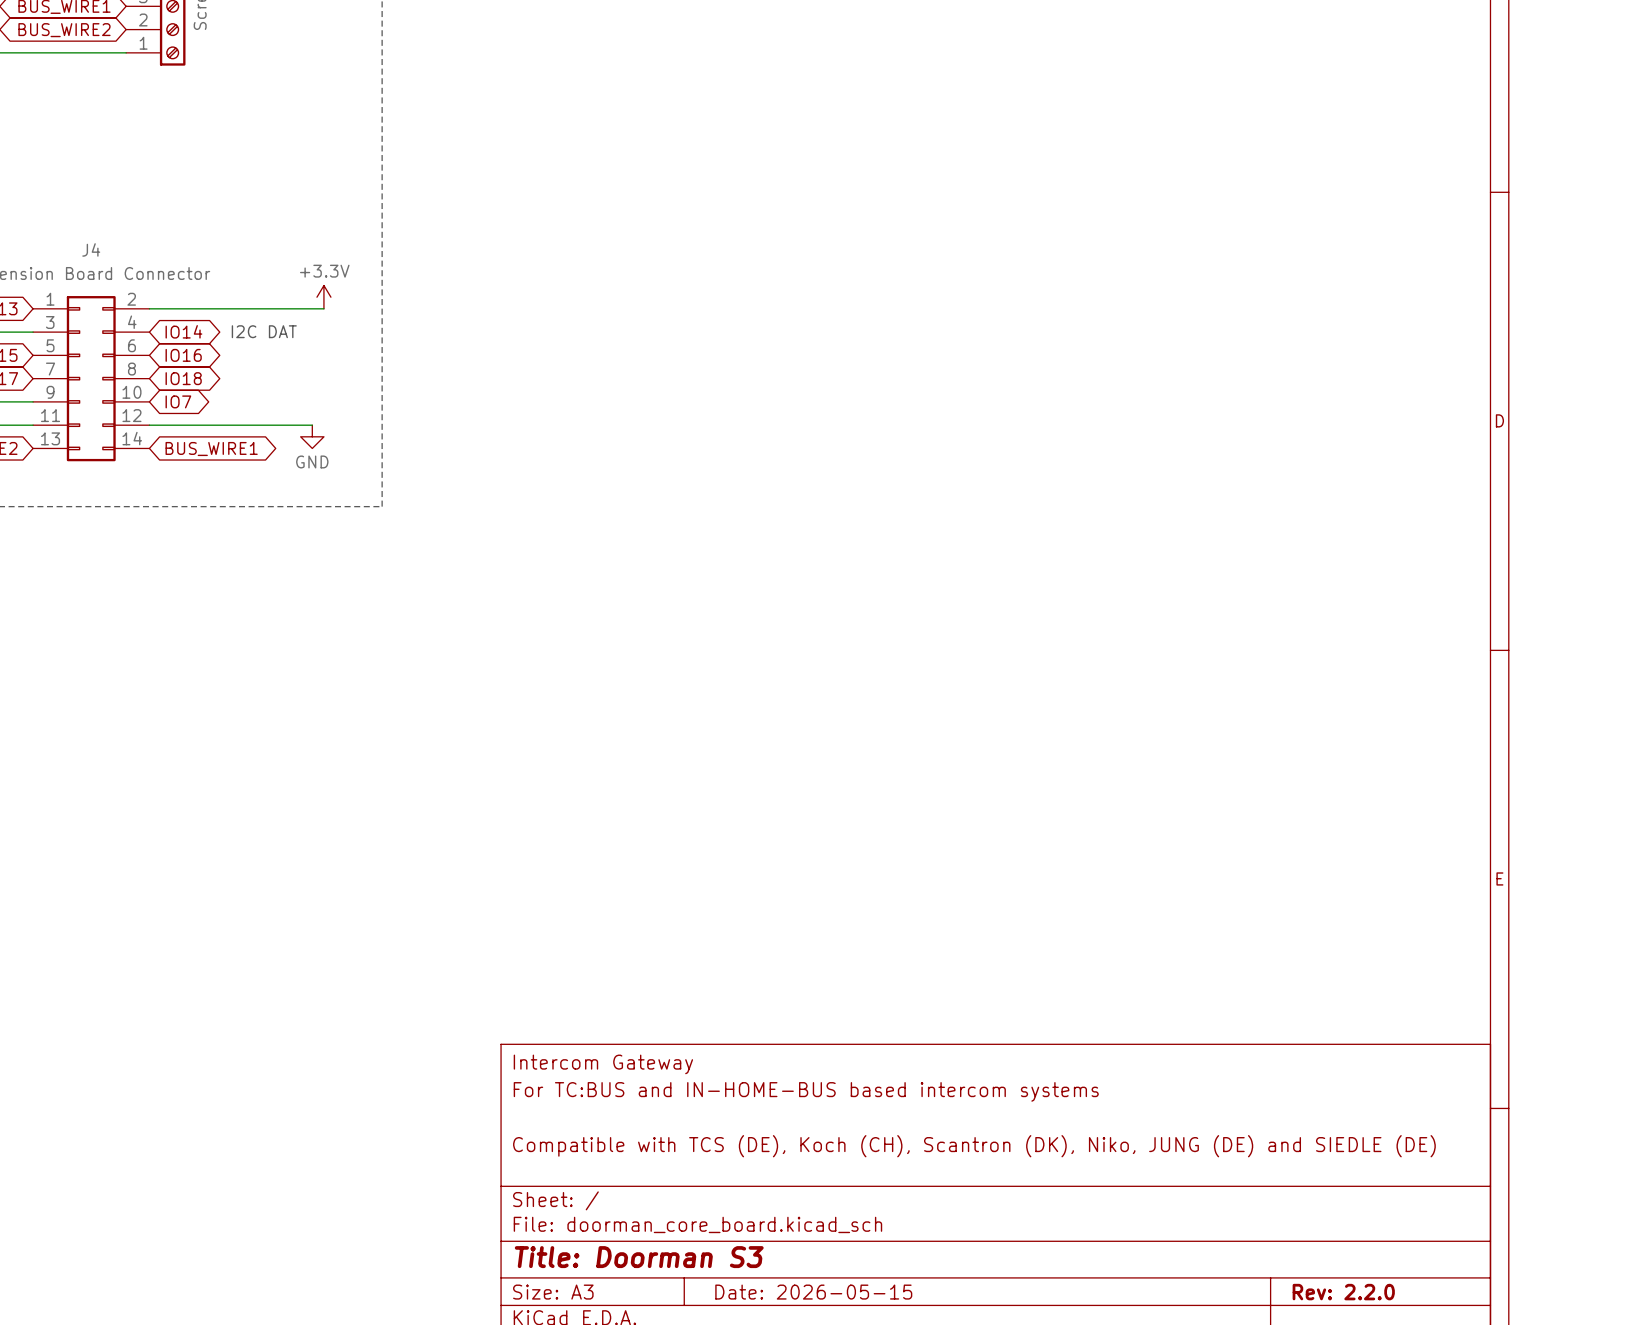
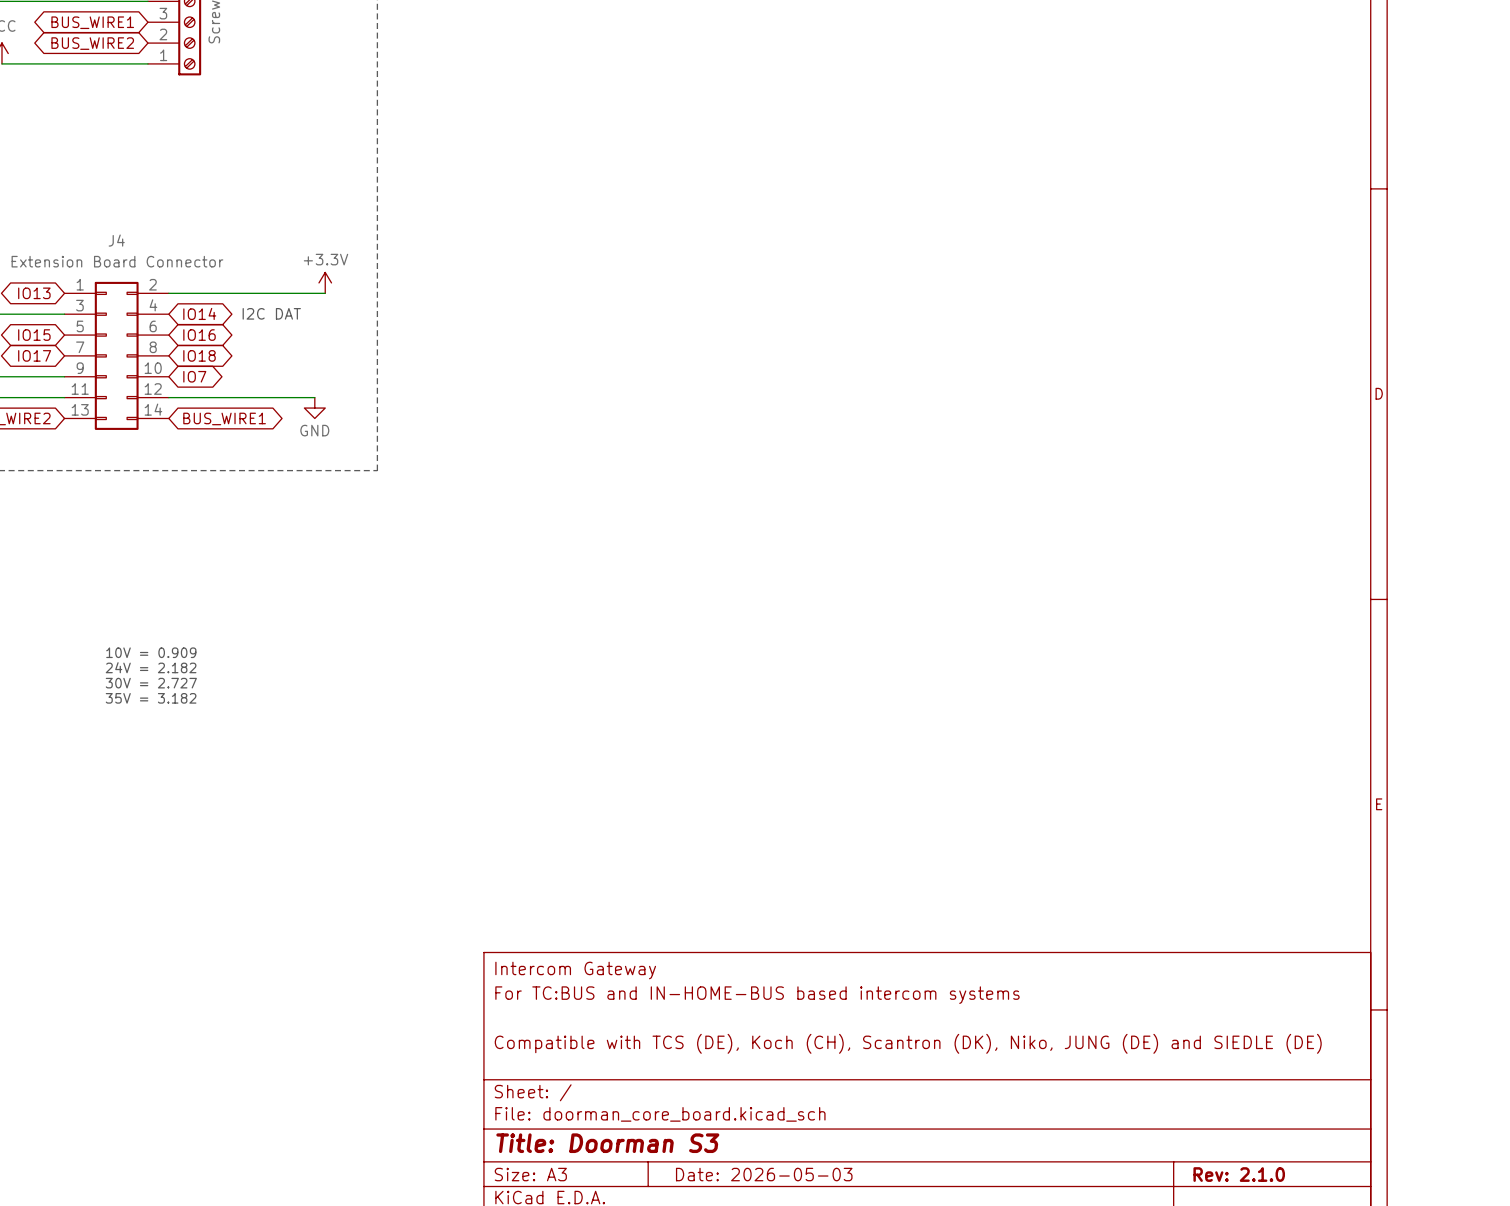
text: none -> 10V = 0.909 (151, 652)
text: none -> 24V = 2.182 (151, 667)
text: none -> 30V = 2.727 (151, 683)
text: none -> 35V = 3.182 (151, 698)
title block: Date: 2026-05-15 (813, 1292) -> Date: 2026-05-03 (764, 1174)
title block: Rev: 2.2.0 (1343, 1292) -> Rev: 2.1.0 (1239, 1174)

